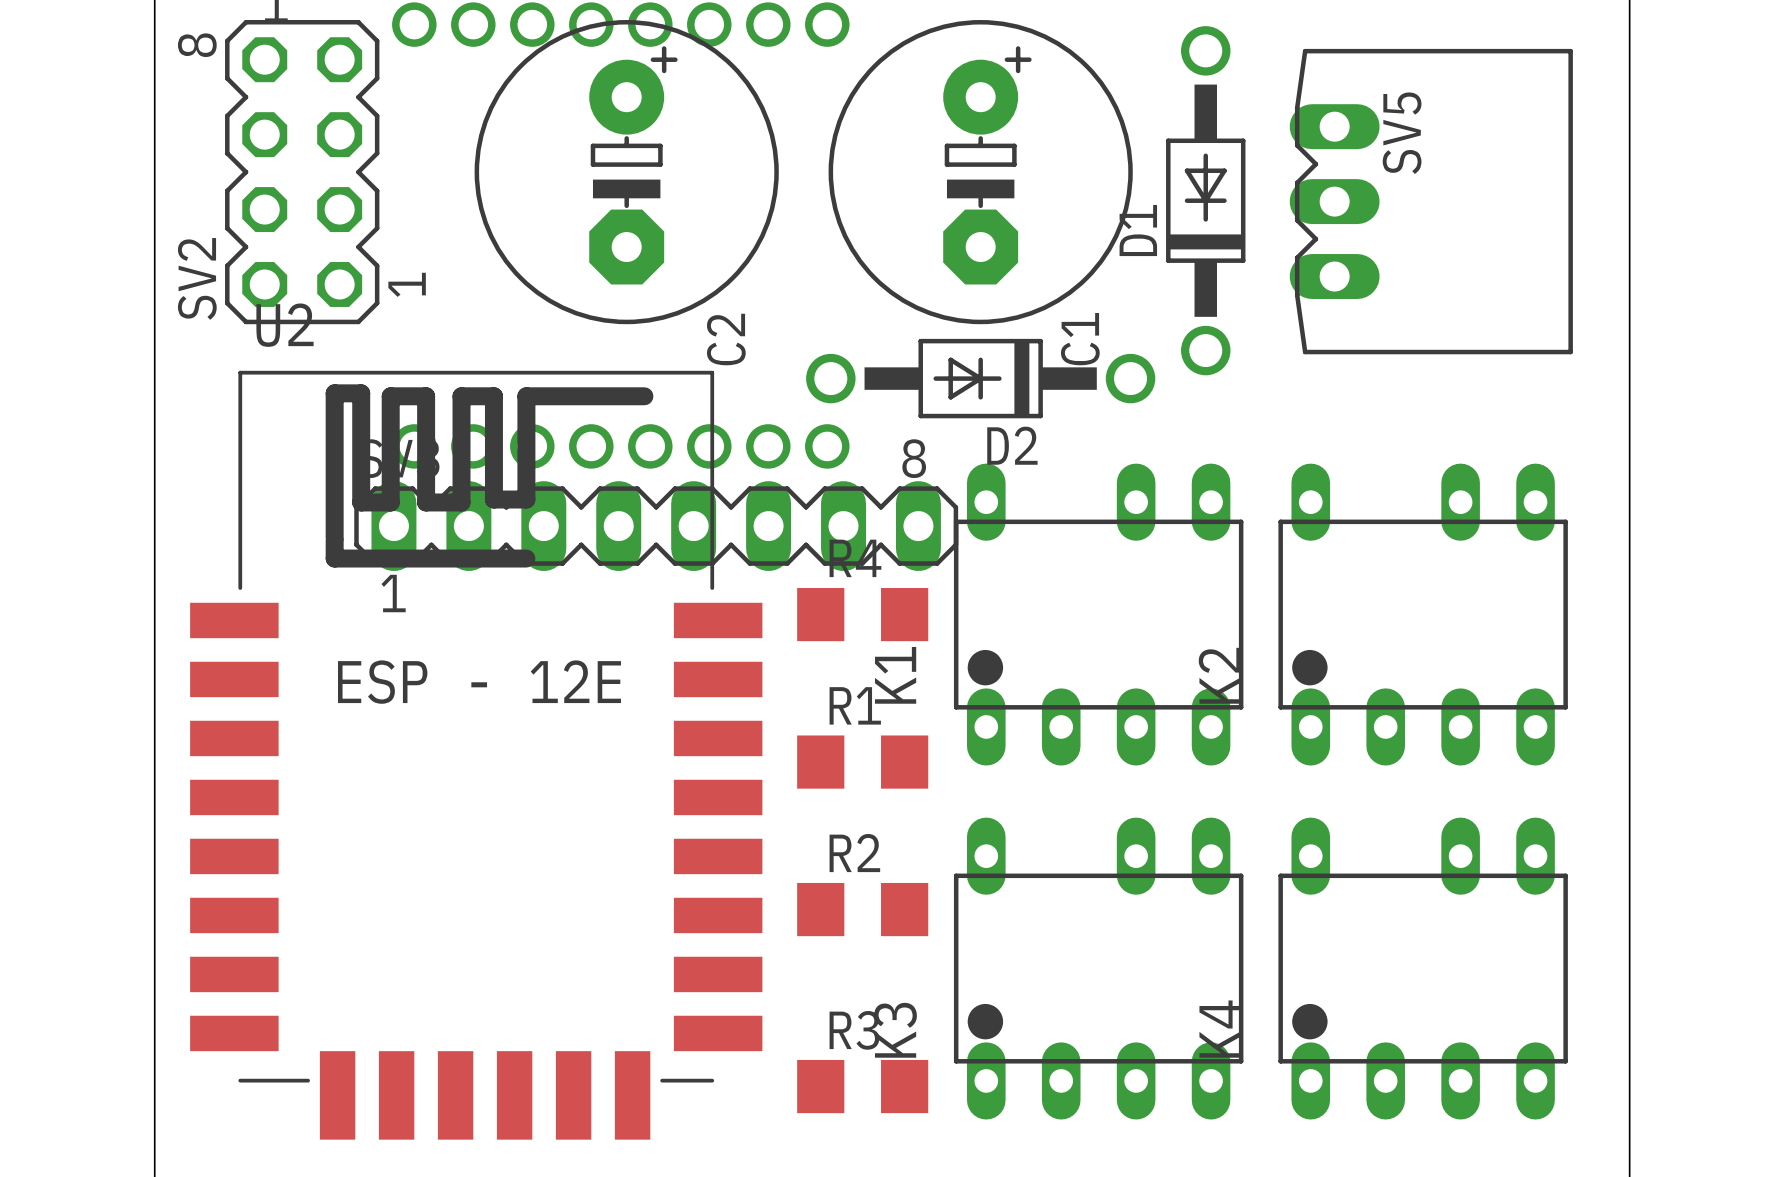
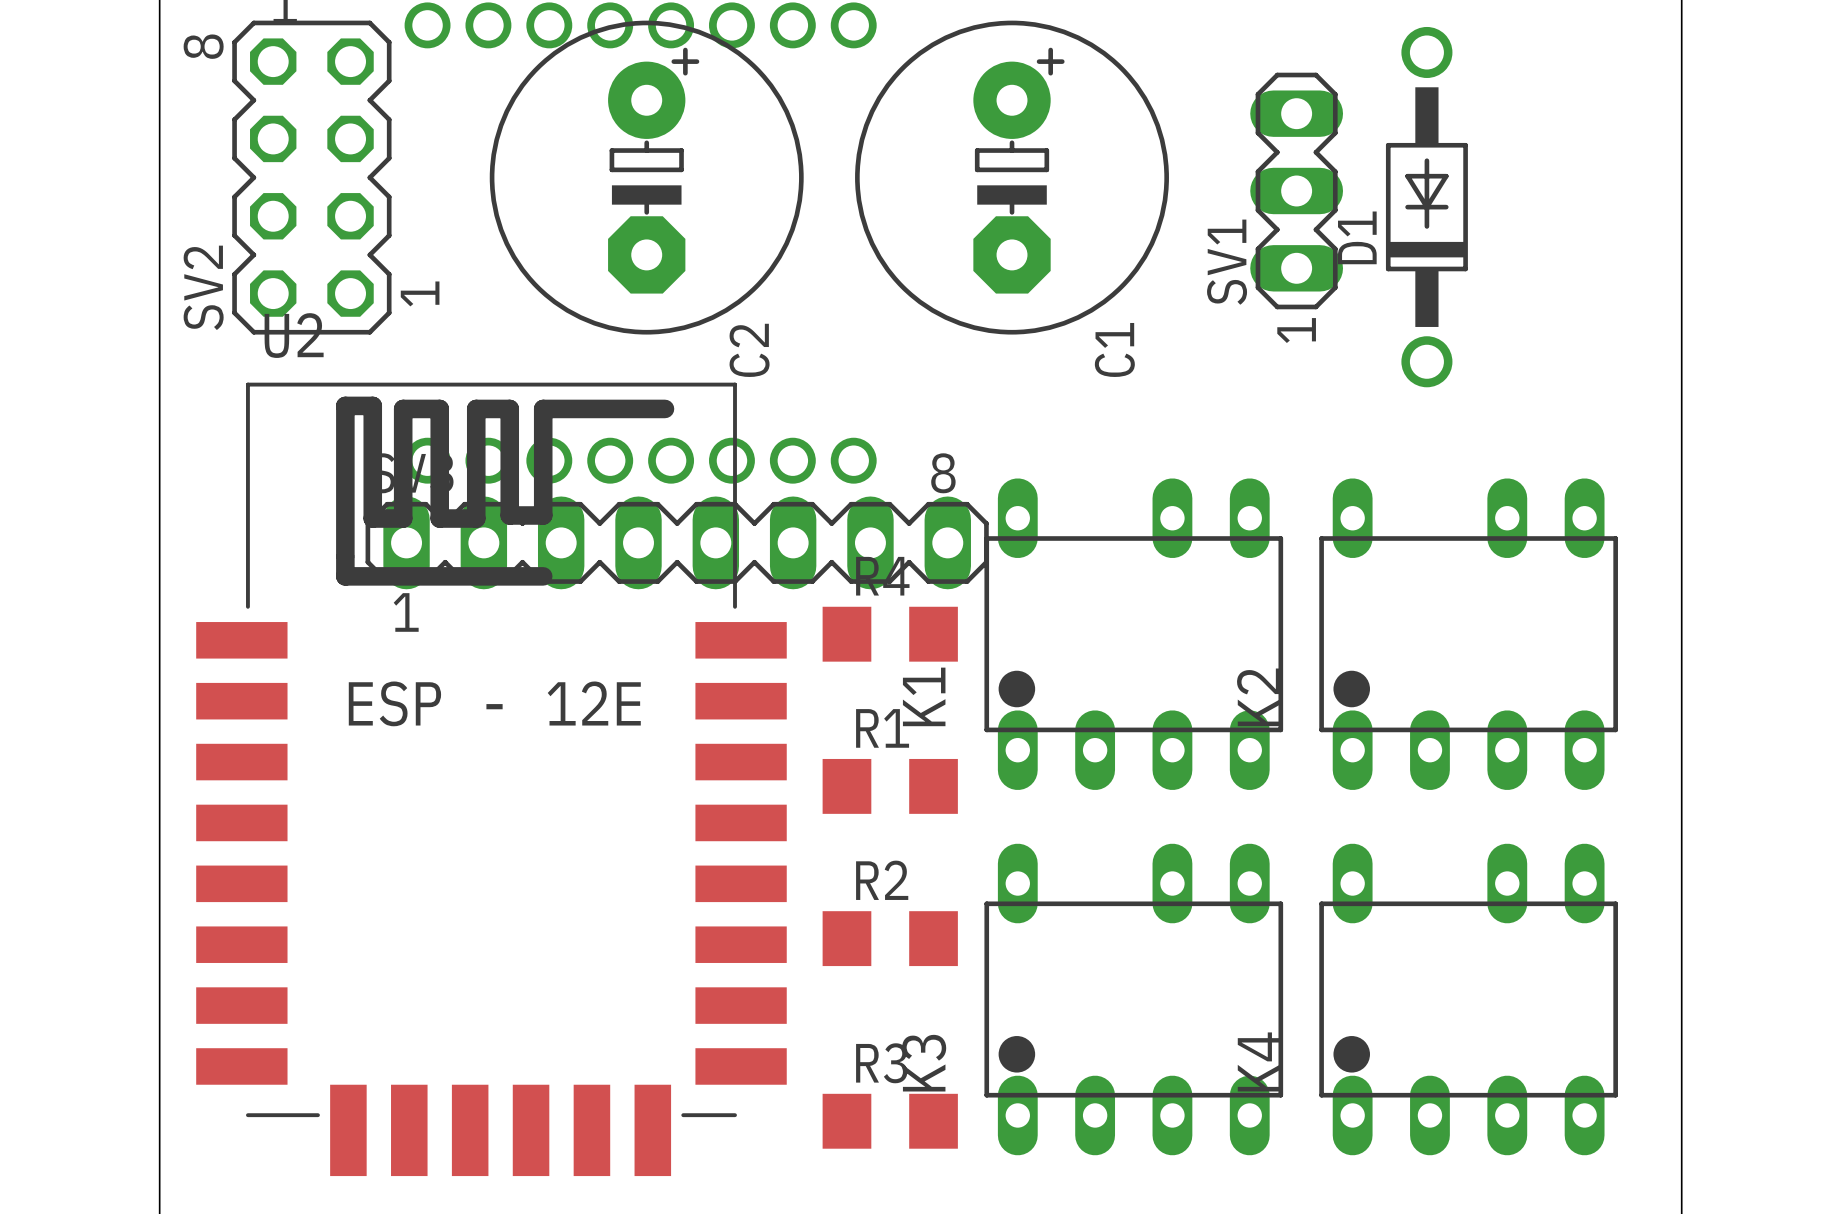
SV1: none -> (1296, 190)
D1 position: (1205, 200) -> (1426, 207)
SV5: (1431, 201) -> none
D2: (980, 378) -> none

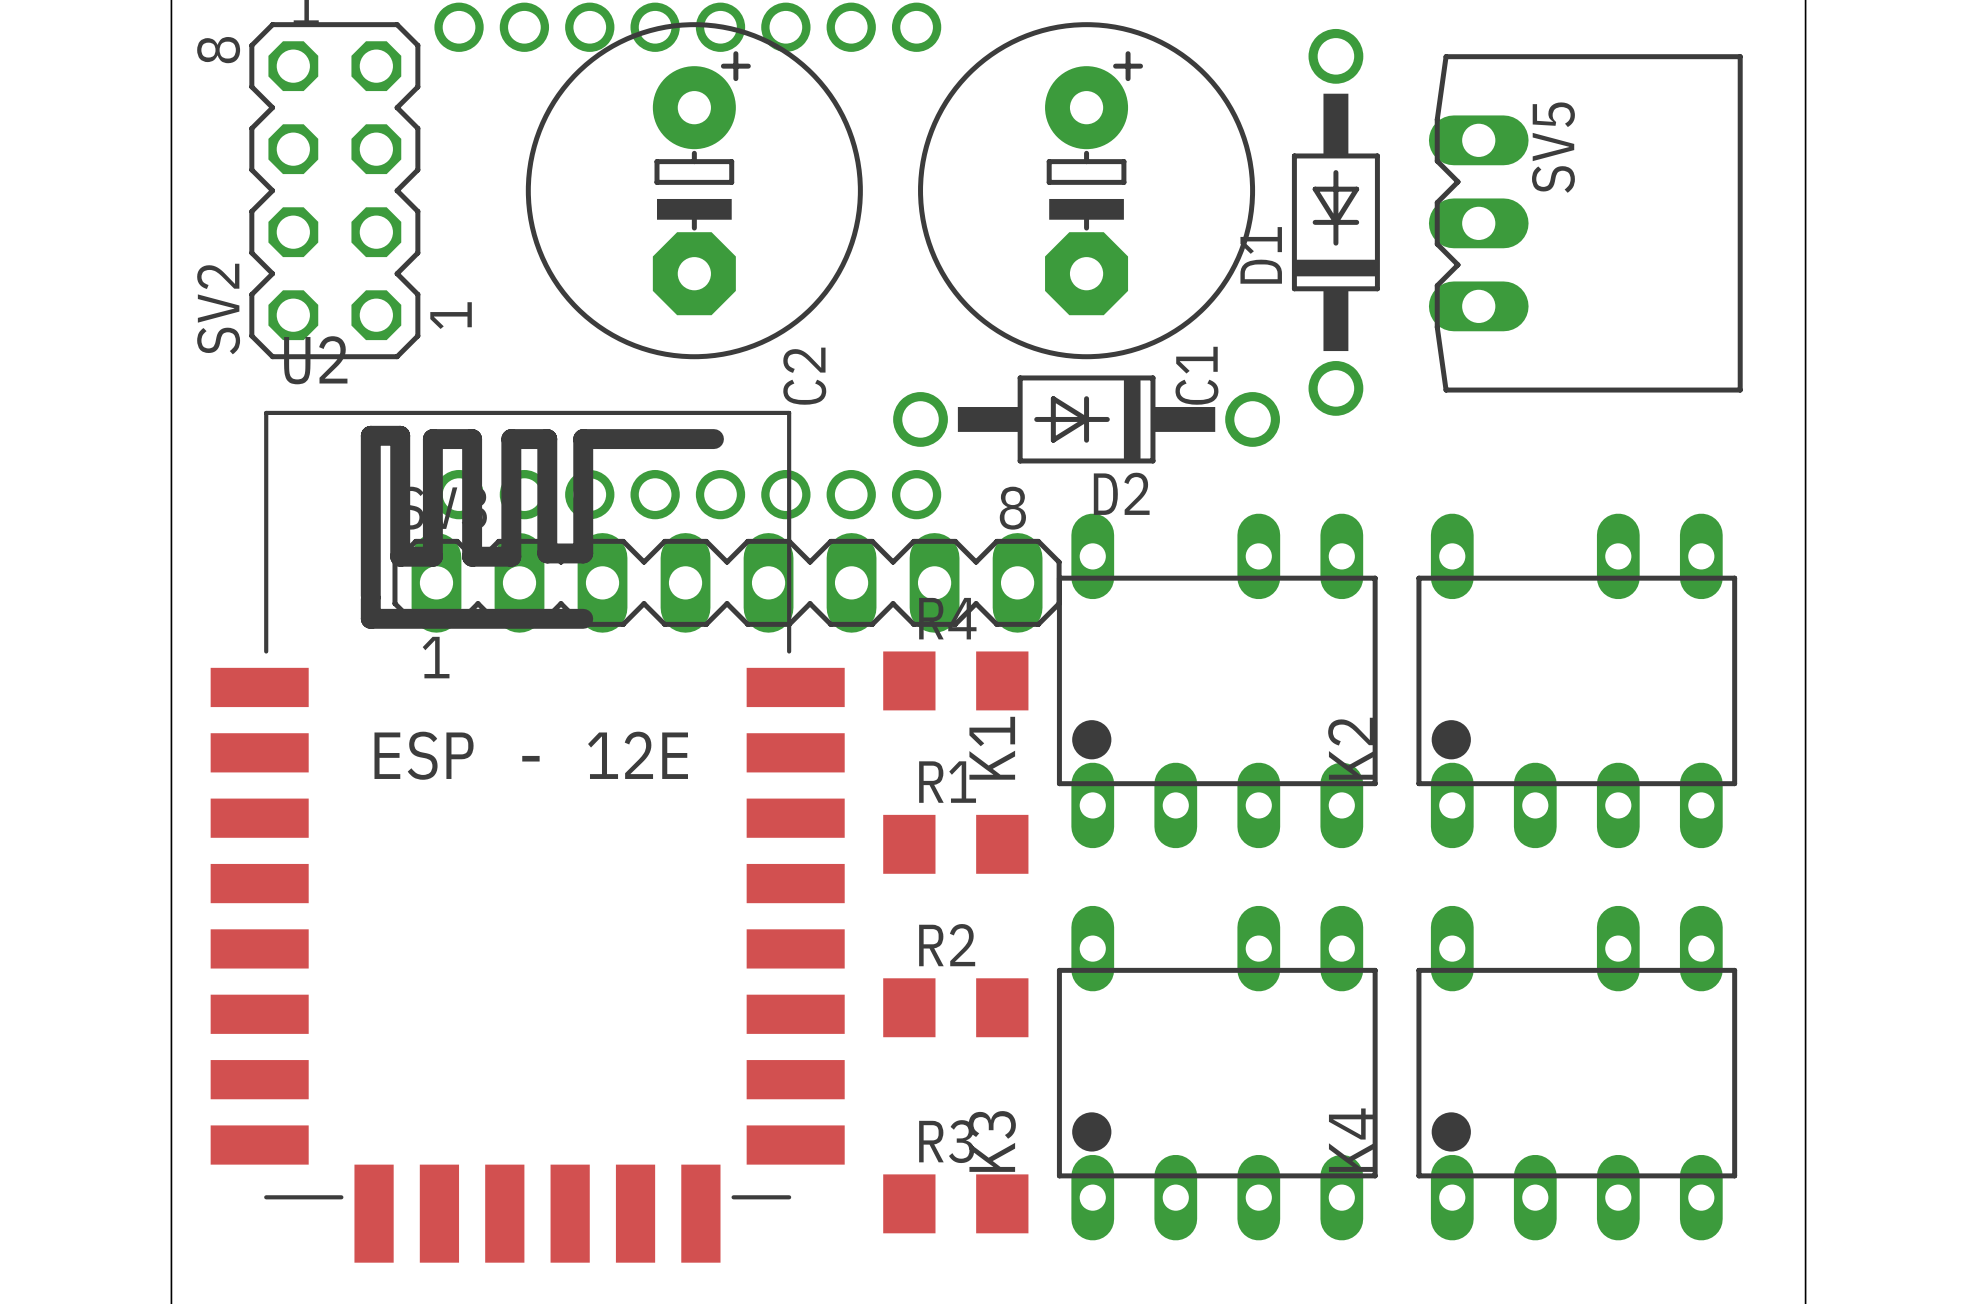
SV1: (1296, 190) -> none
D1 position: (1426, 207) -> (1335, 222)
SV5: none -> (1585, 223)
D2: none -> (1086, 419)

